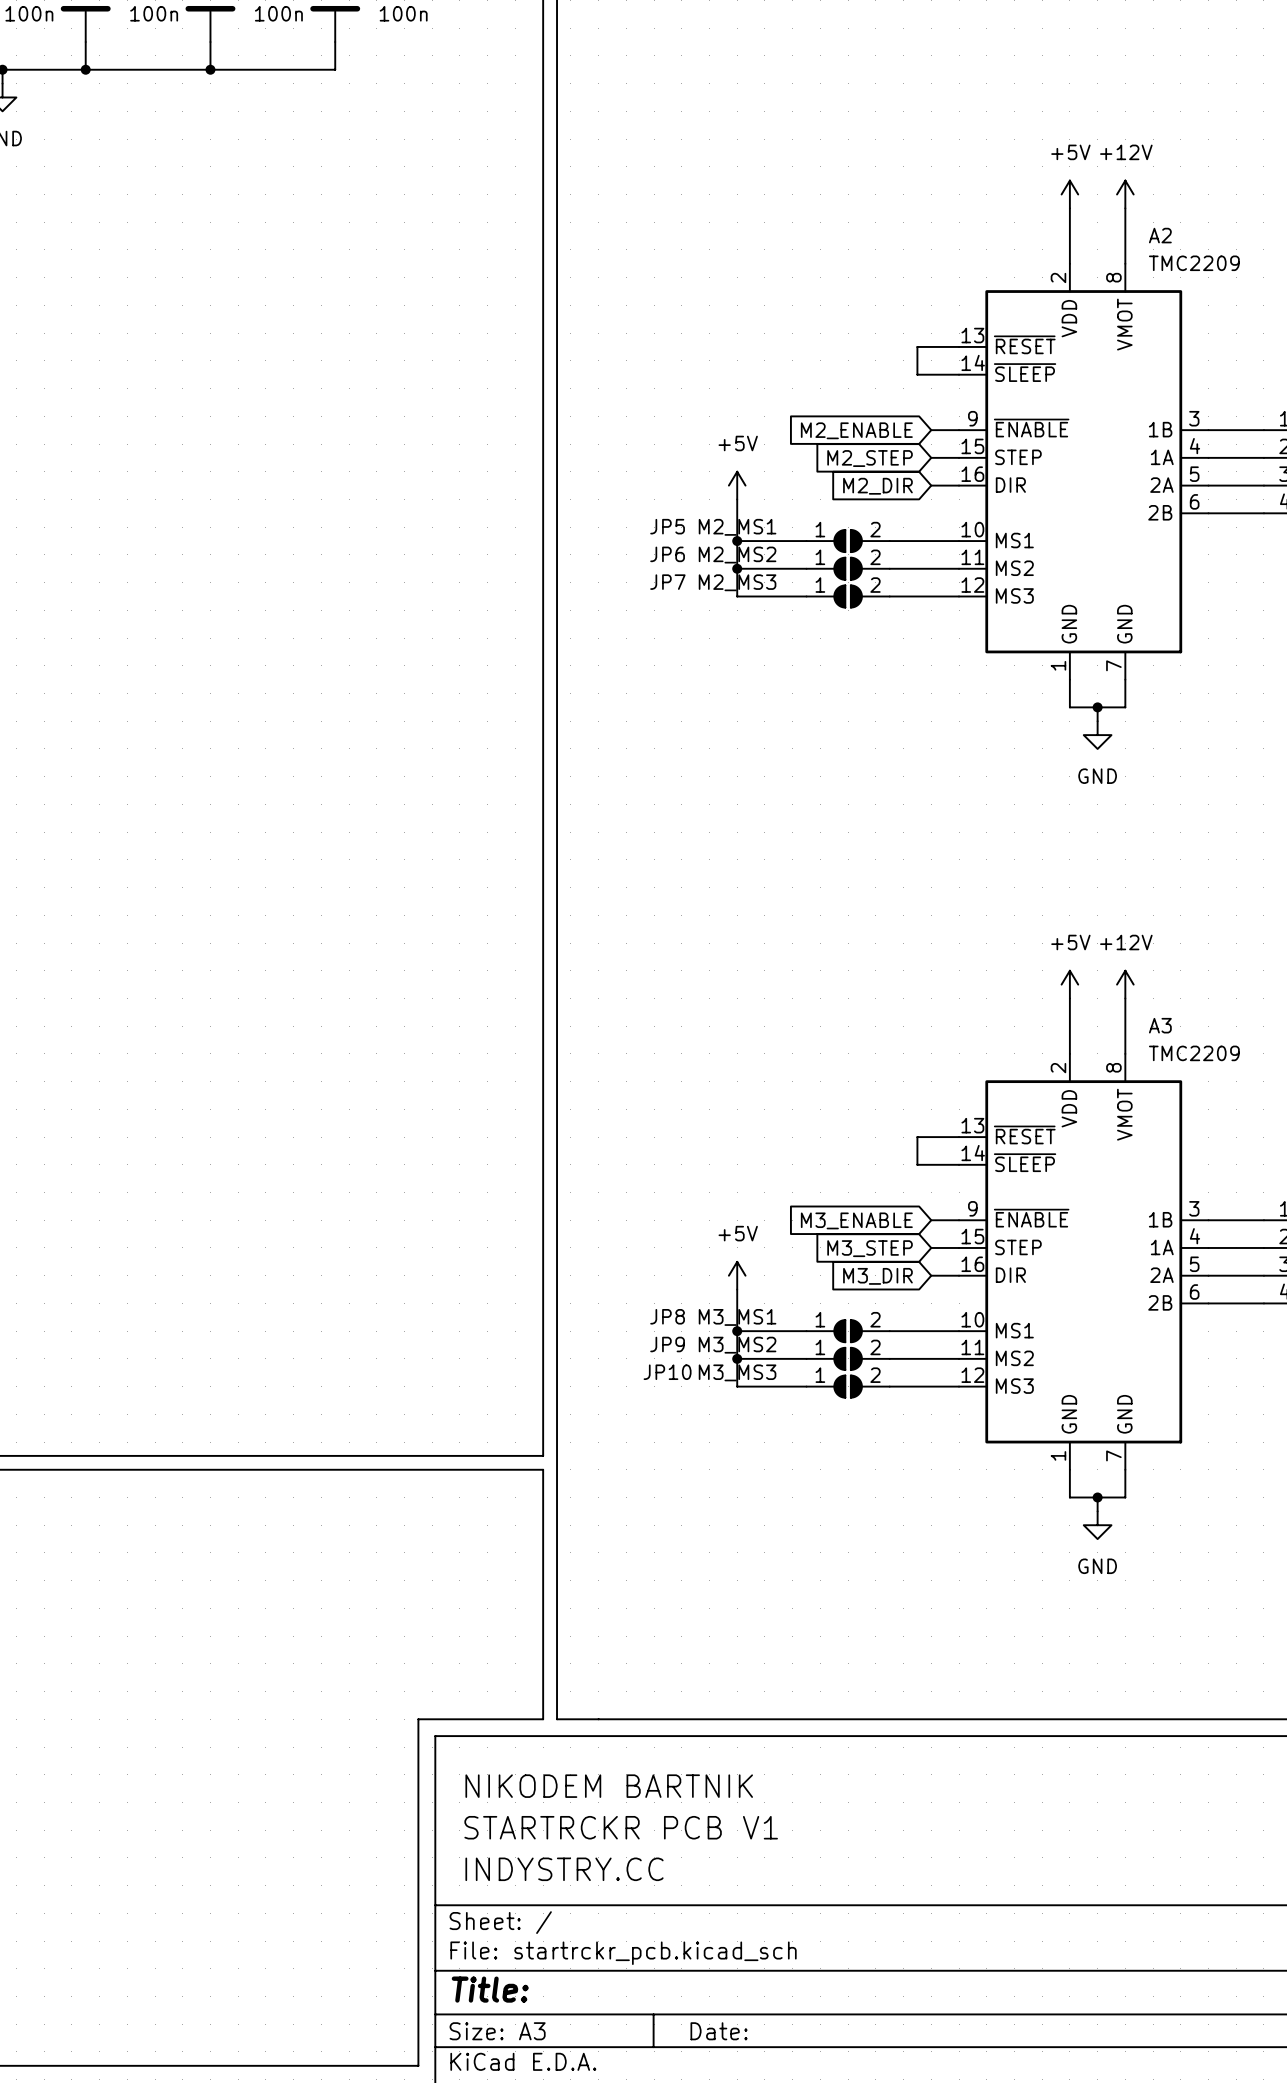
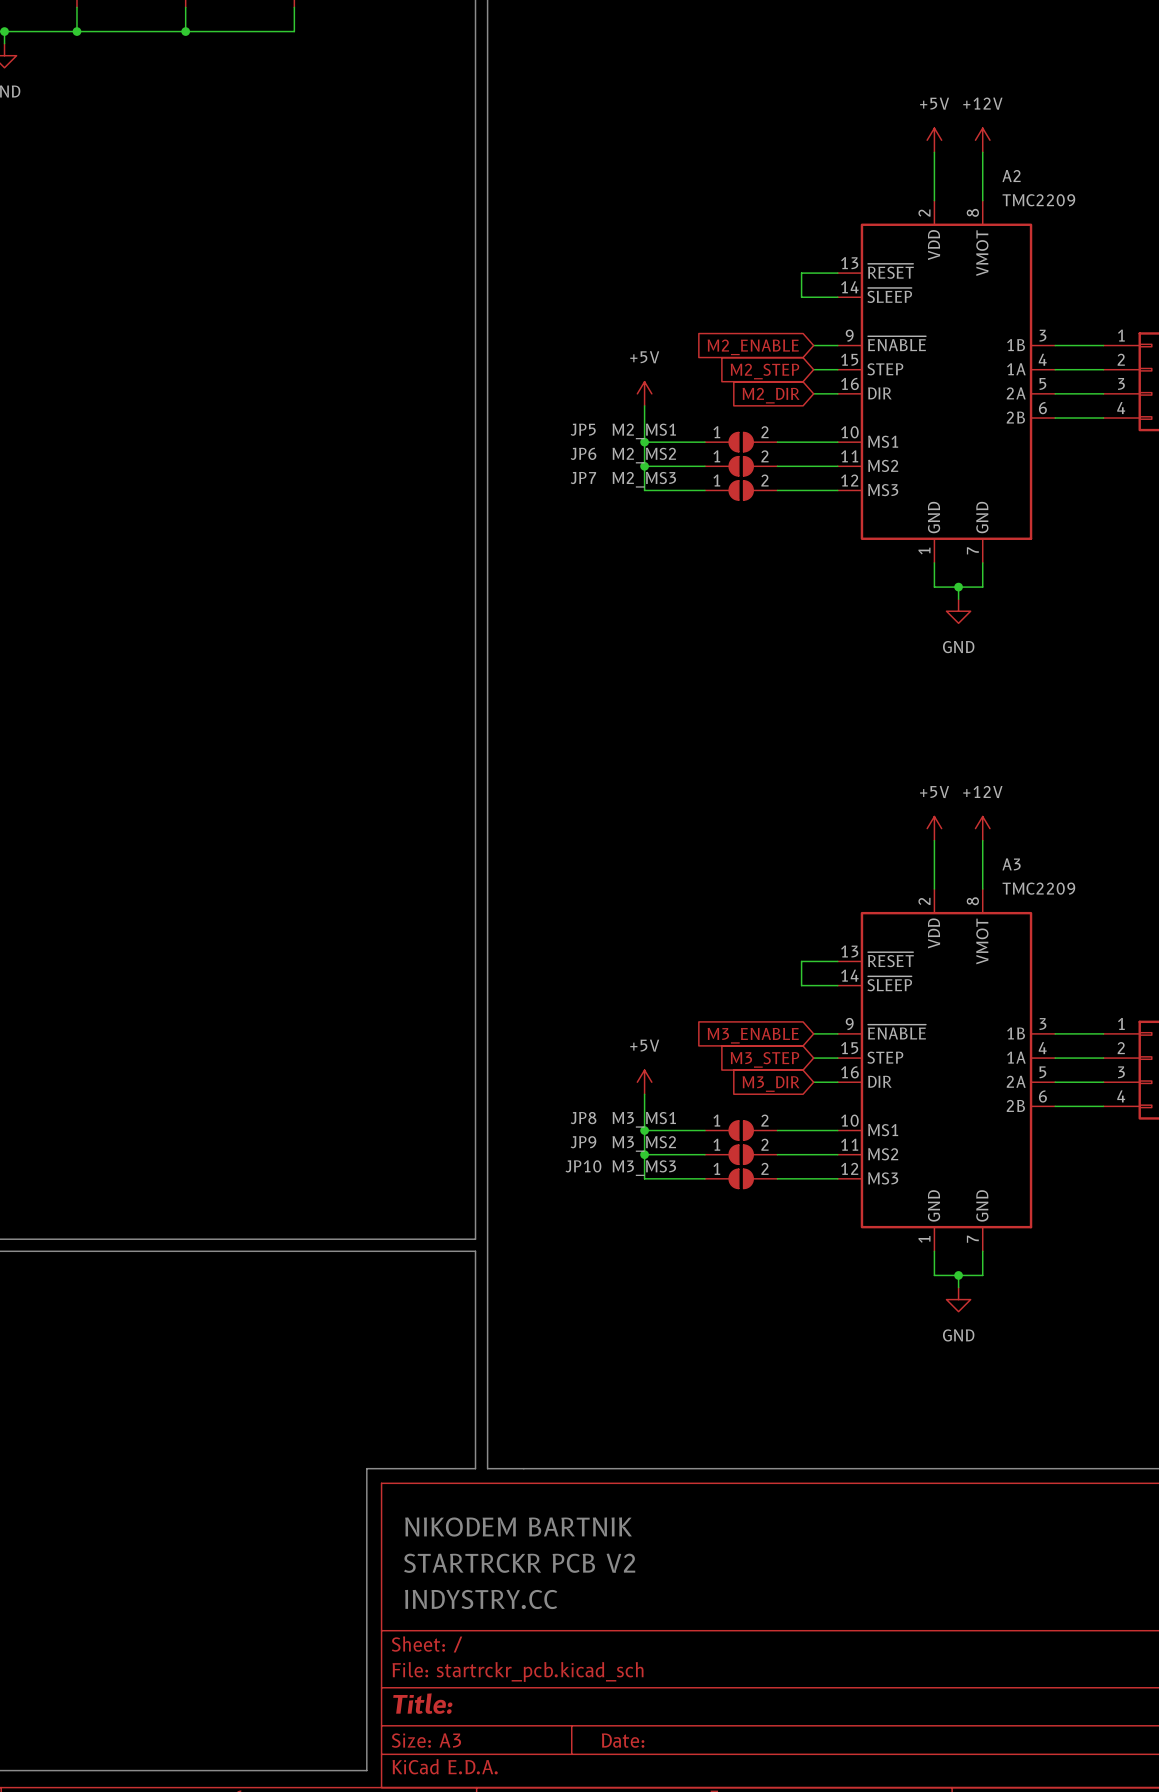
text: STARTRCKR PCB V1 (621, 1827) -> STARTRCKR PCB V2 (519, 1563)

